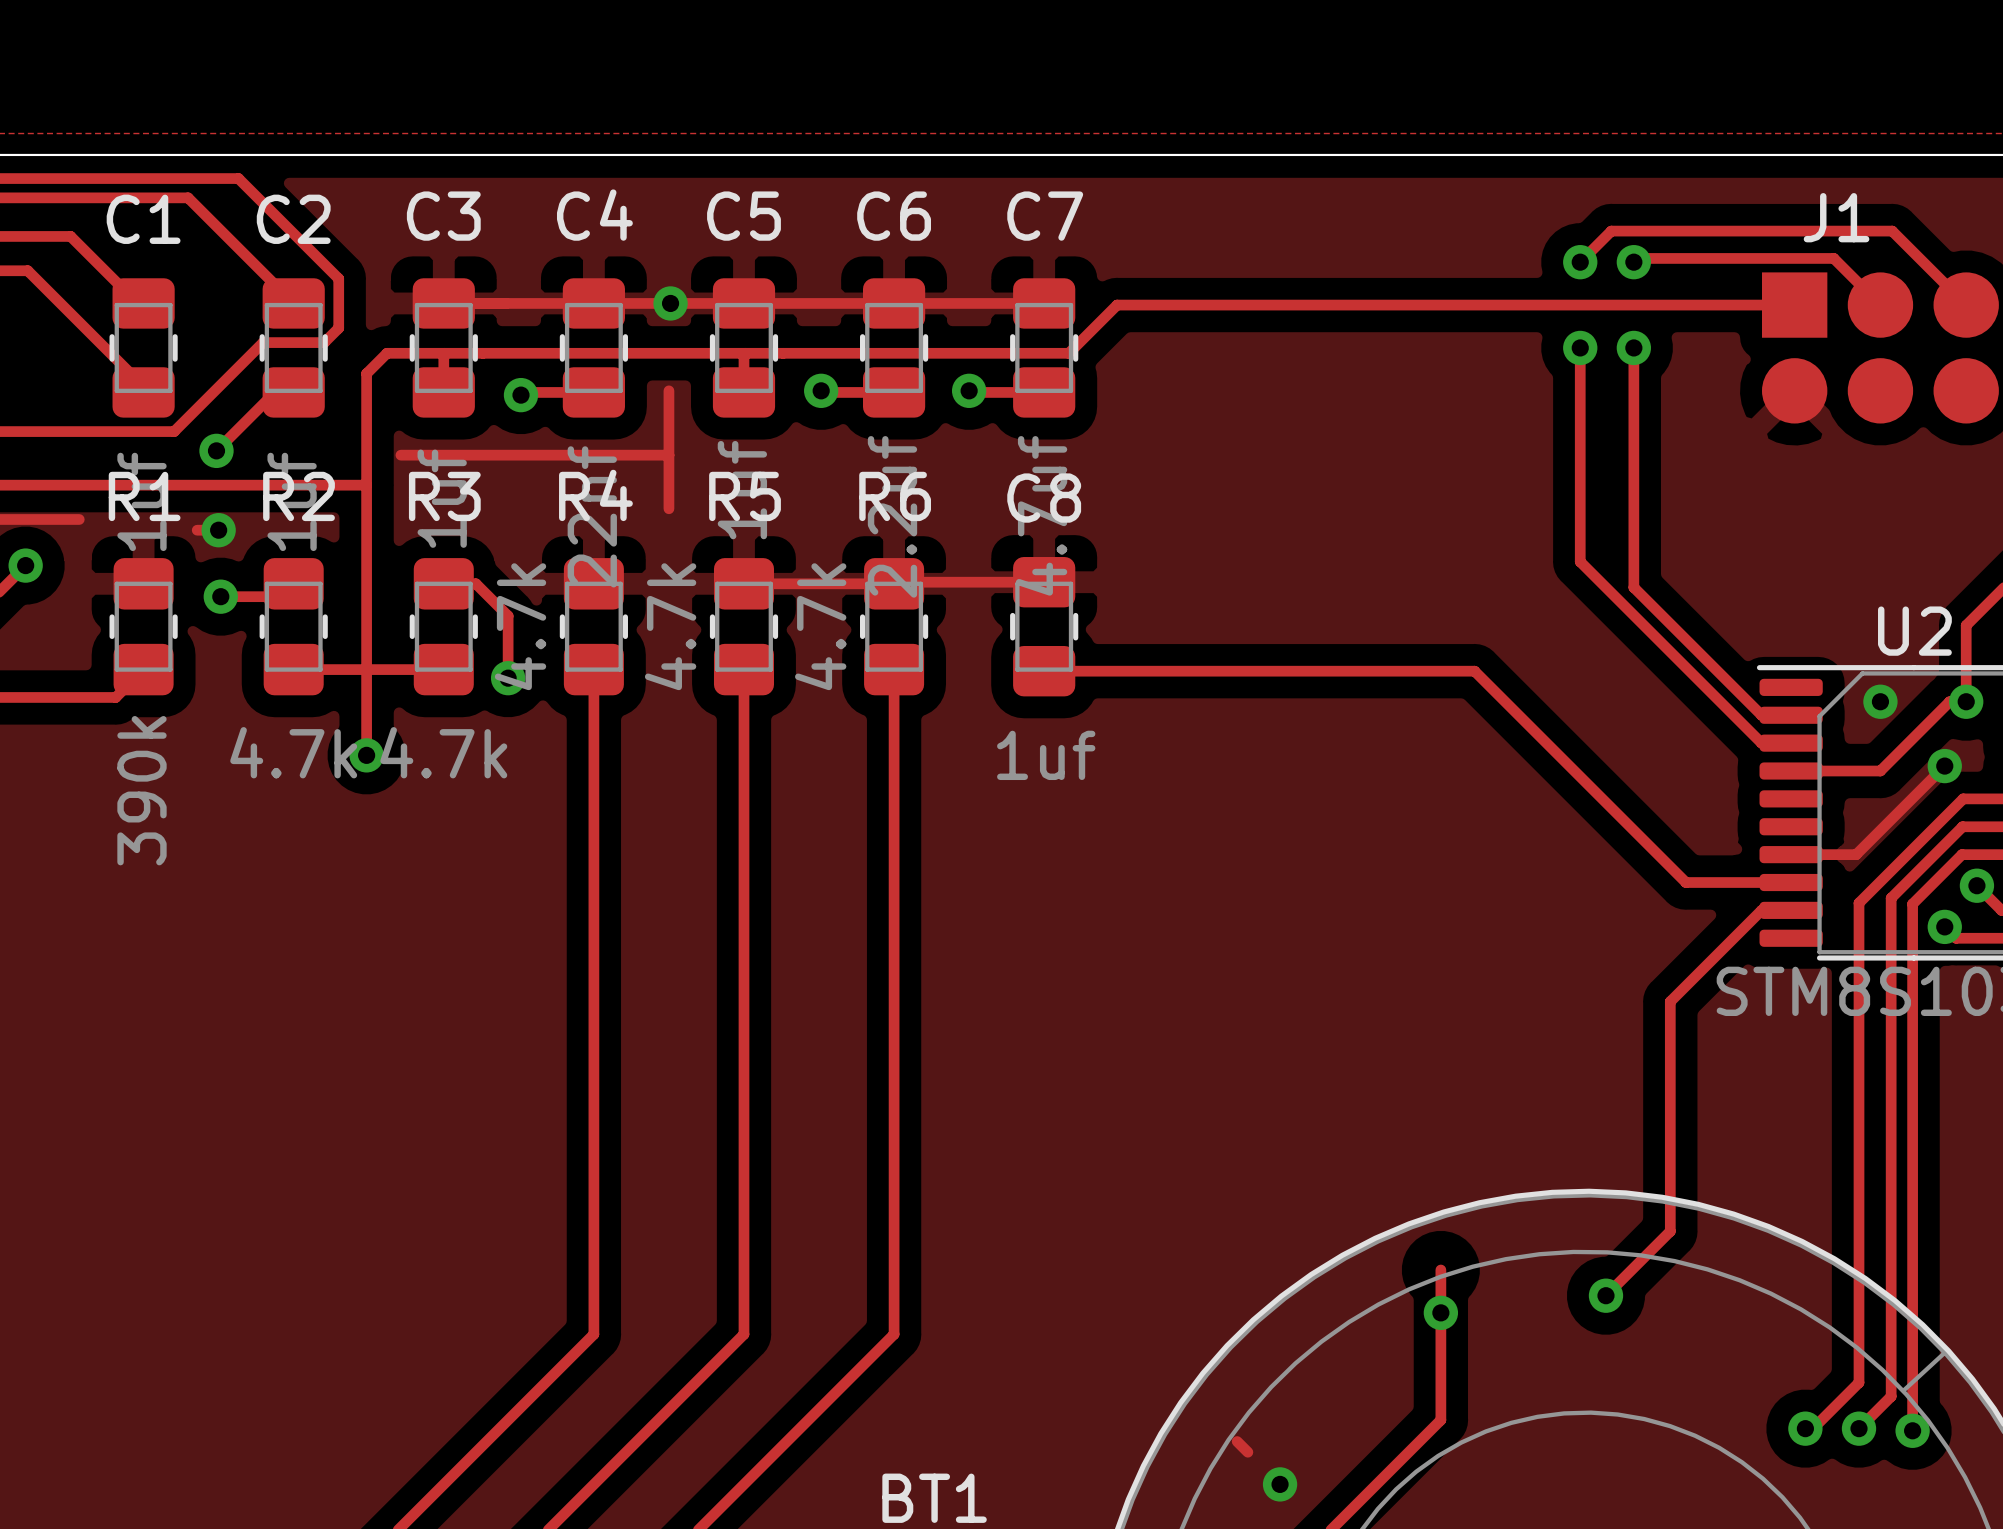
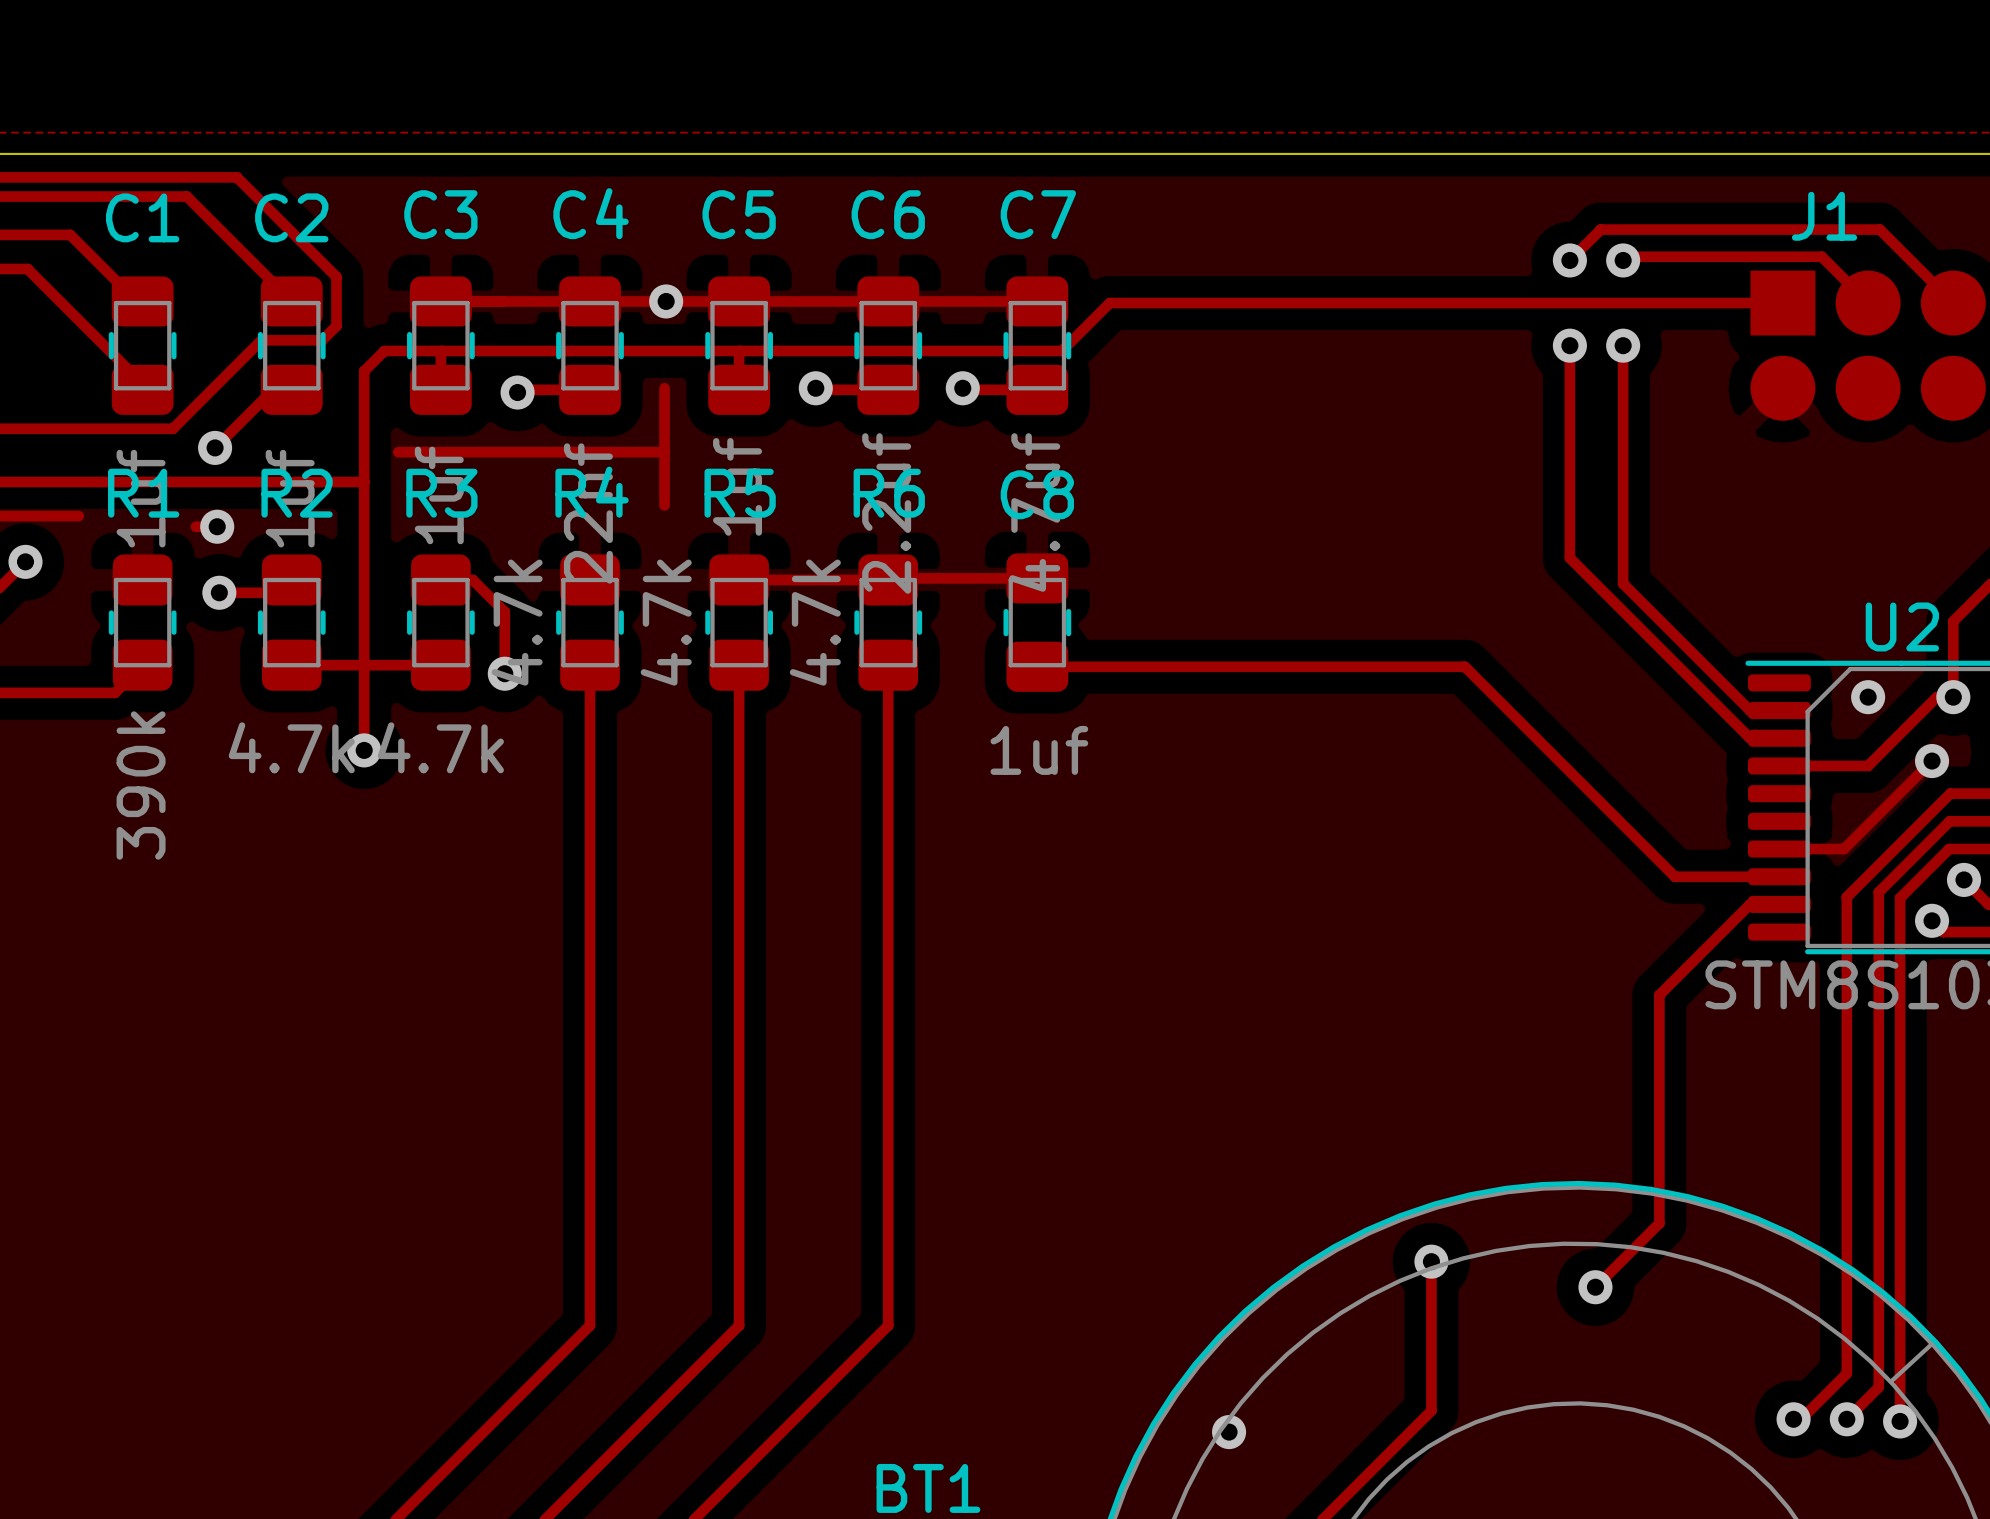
via position: (1440, 1312) -> (1431, 1261)
track: (1237, 1441) (1247, 1452) -> none
via position: (1280, 1484) -> (1229, 1432)

